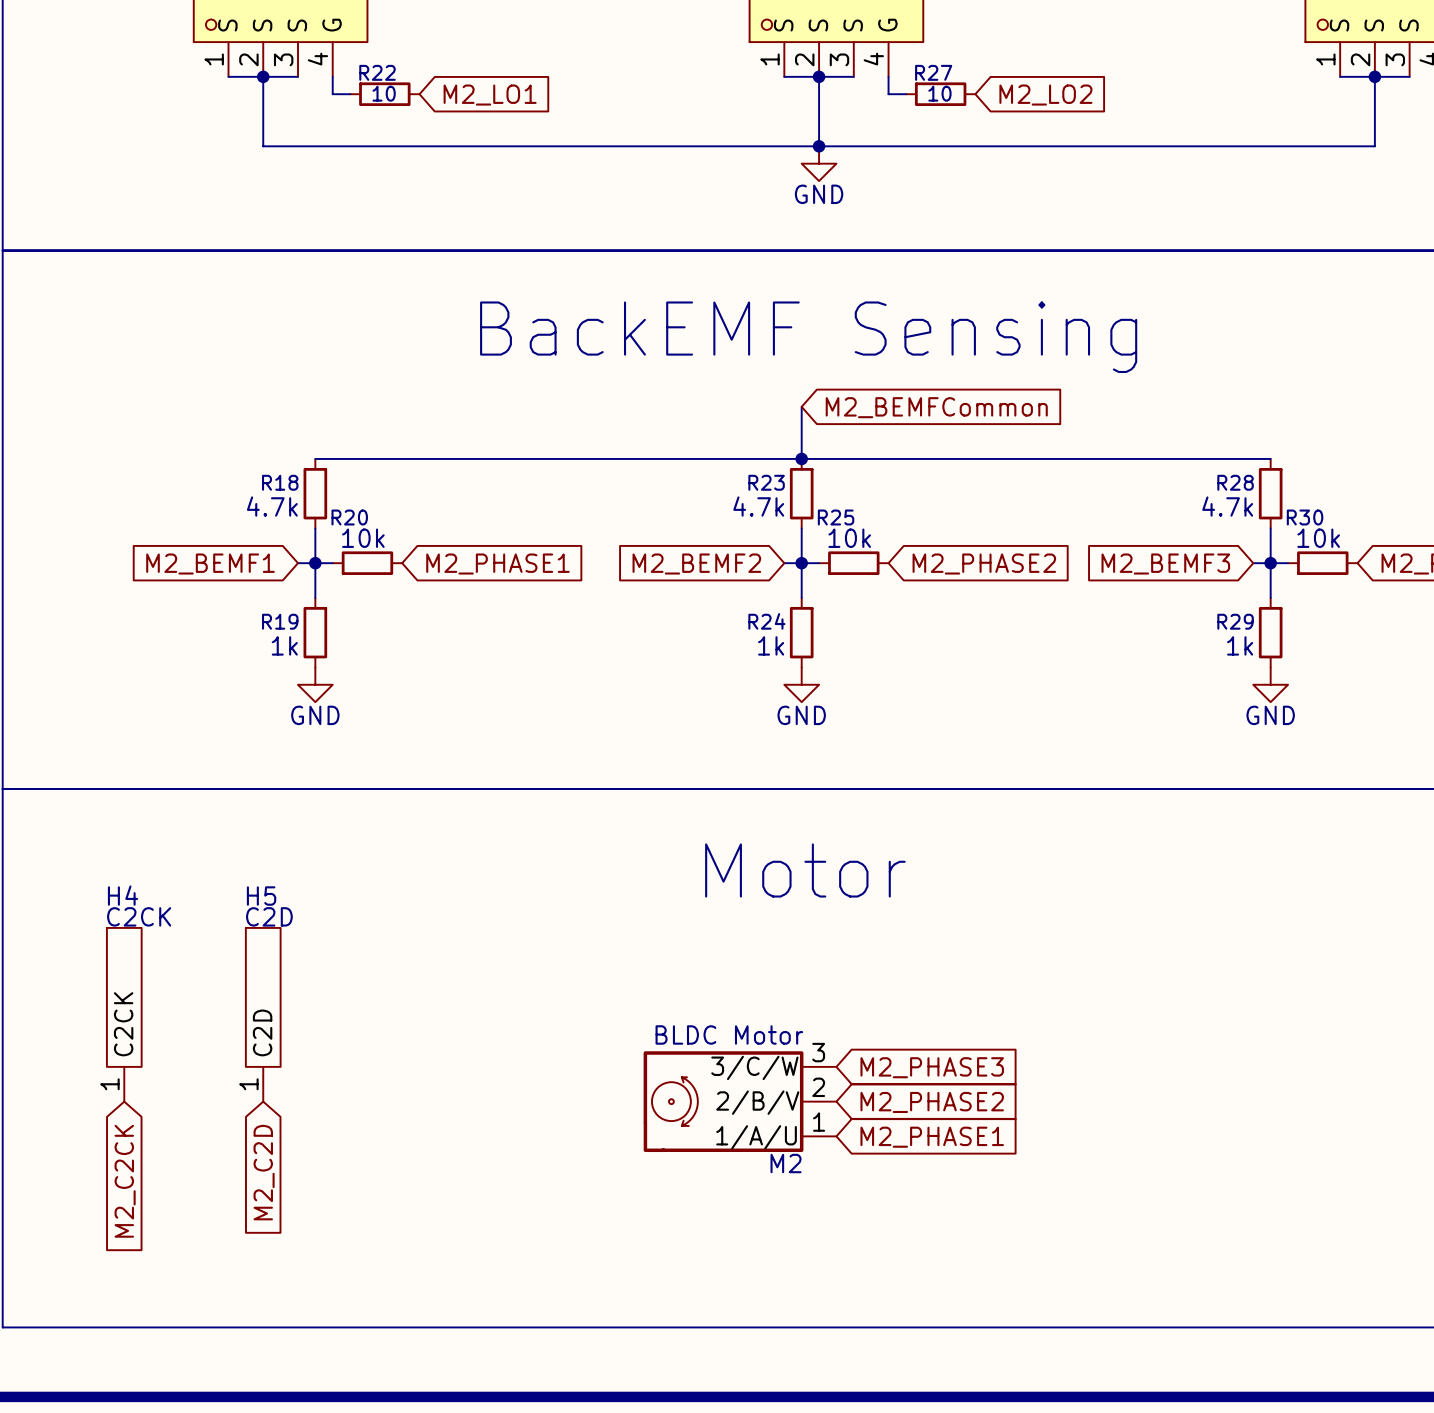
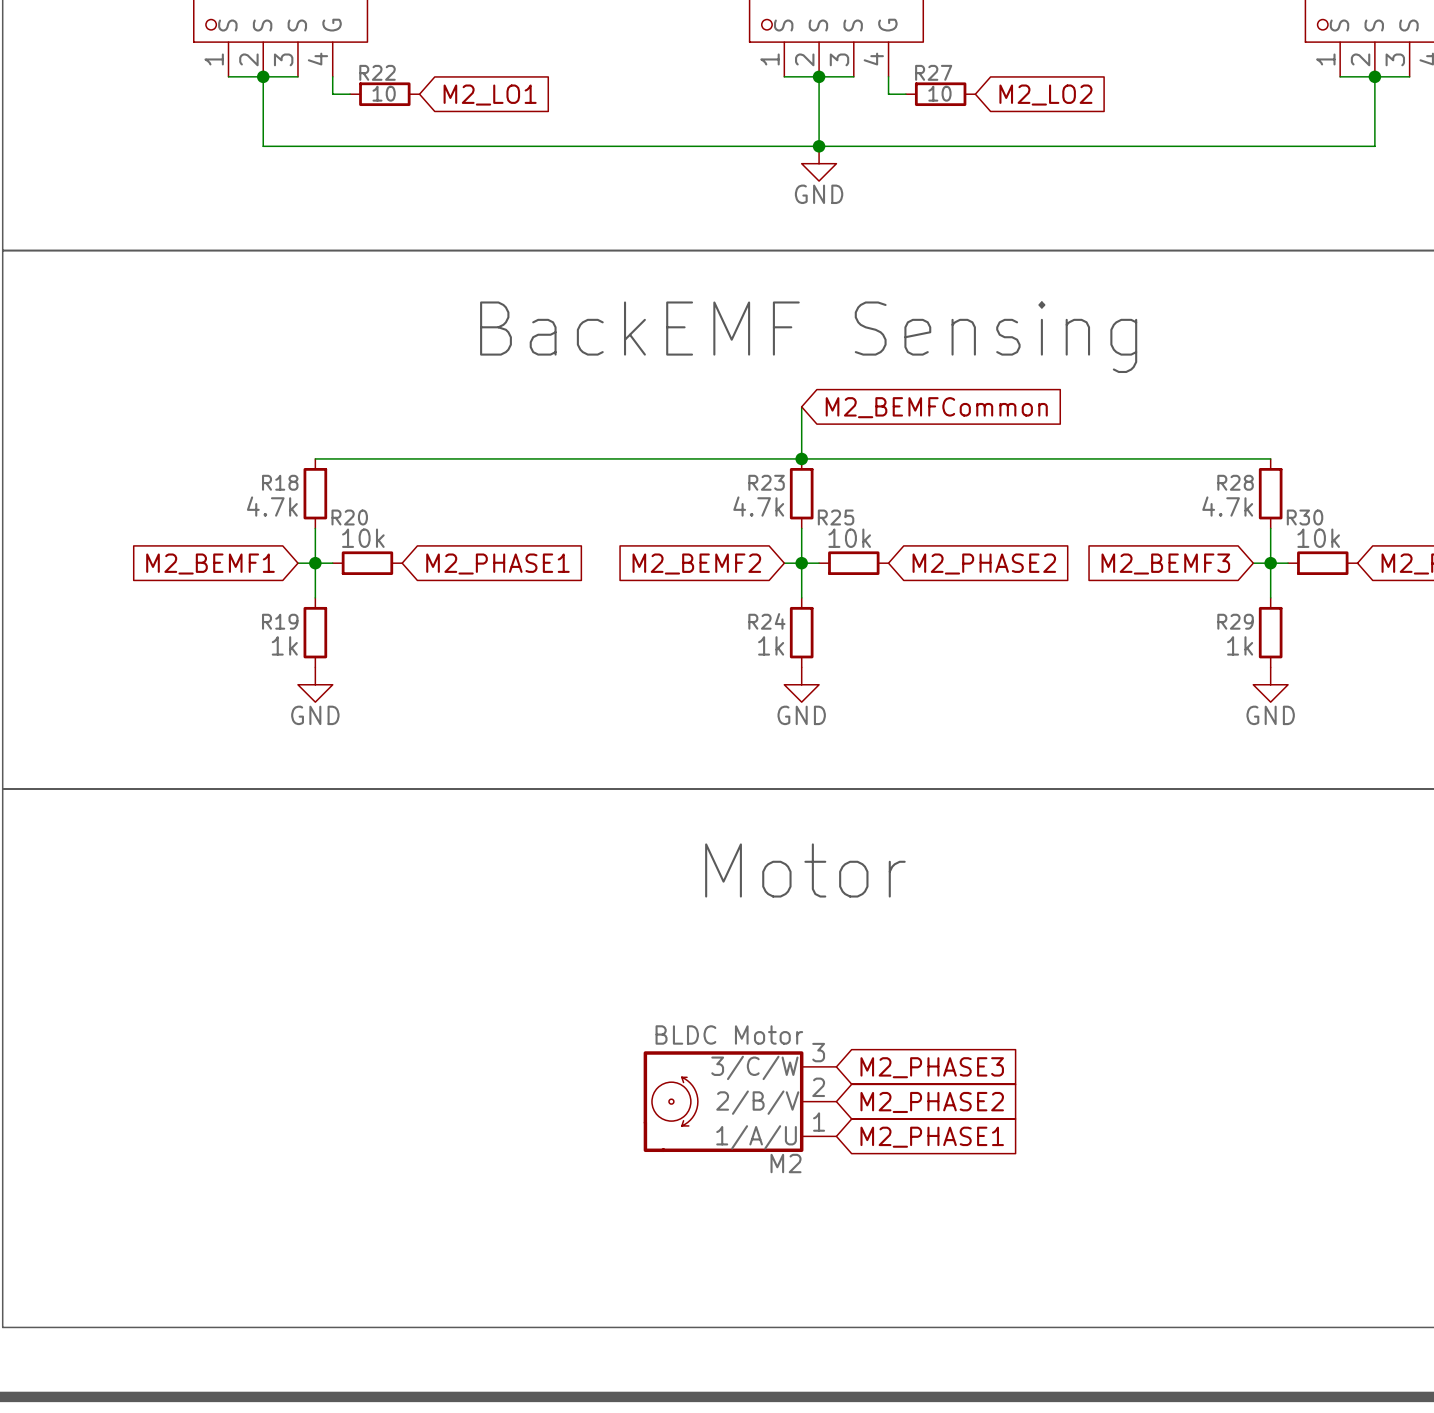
H4: C2CK (124, 1014) -> none
H5: C2D (263, 1014) -> none
global label: M2_C2D (264, 1172) -> none
global label: M2_C2CK (125, 1181) -> none

